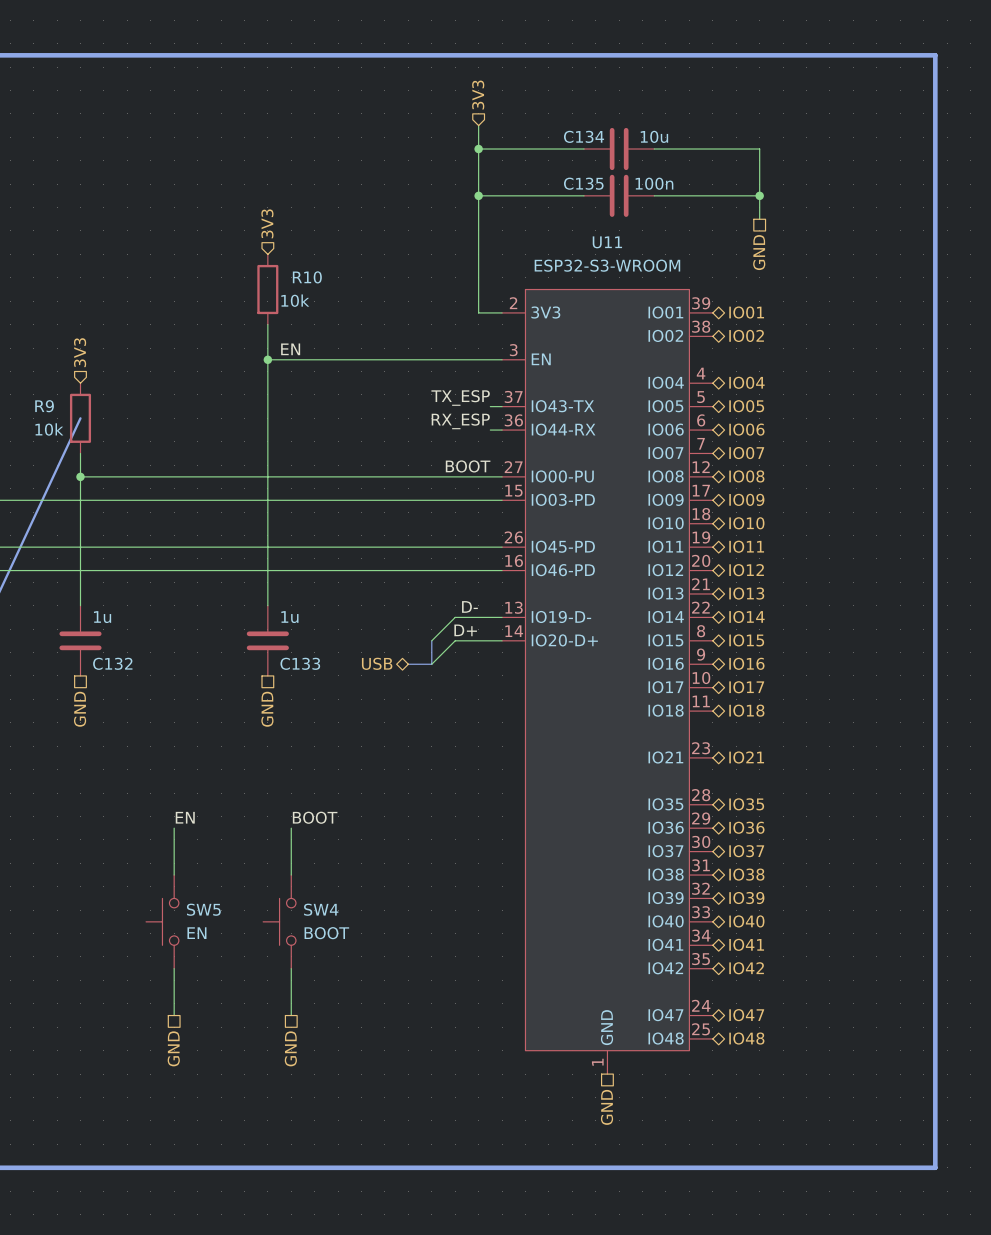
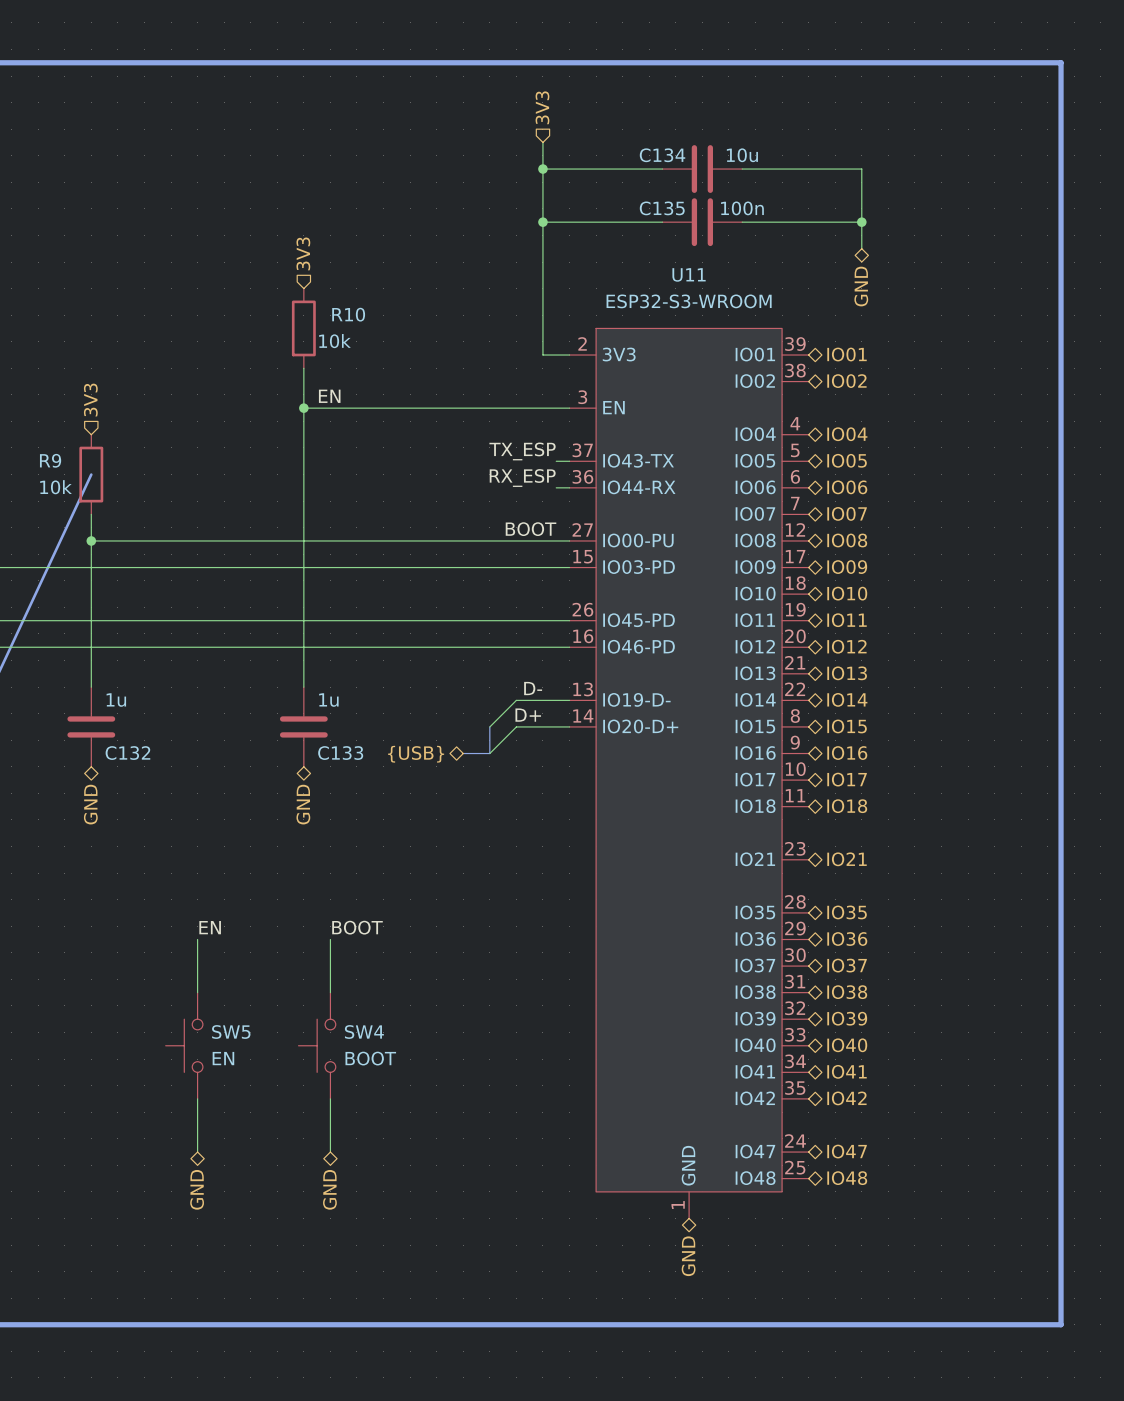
hierarchical label shape: passive (759, 252) -> bidirectional (861, 286)
hierarchical label: USB (377, 663) -> {USB} (416, 754)
hierarchical label shape: passive (80, 709) -> bidirectional (90, 804)
hierarchical label shape: passive (267, 709) -> bidirectional (303, 804)
hierarchical label shape: passive (173, 1048) -> bidirectional (197, 1189)
hierarchical label shape: passive (290, 1048) -> bidirectional (329, 1189)
hierarchical label shape: passive (607, 1107) -> bidirectional (688, 1256)

